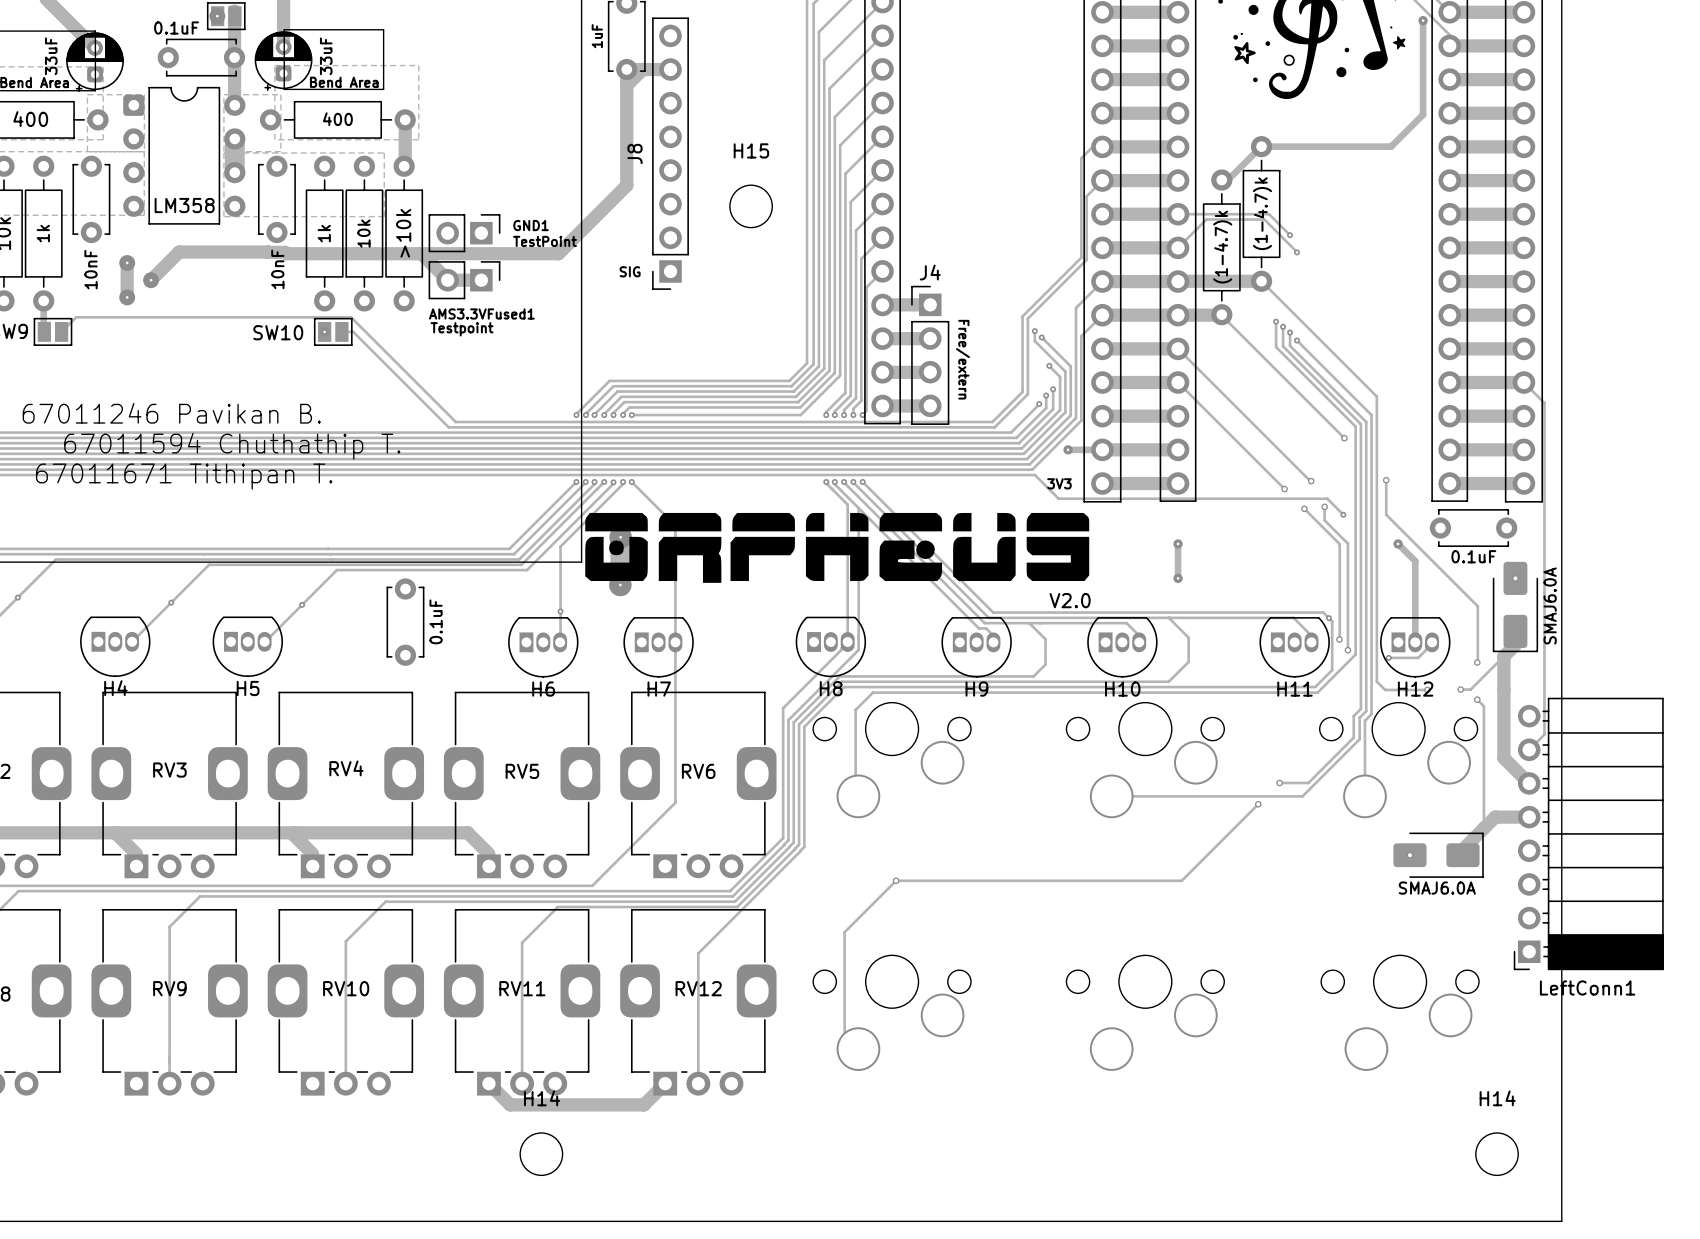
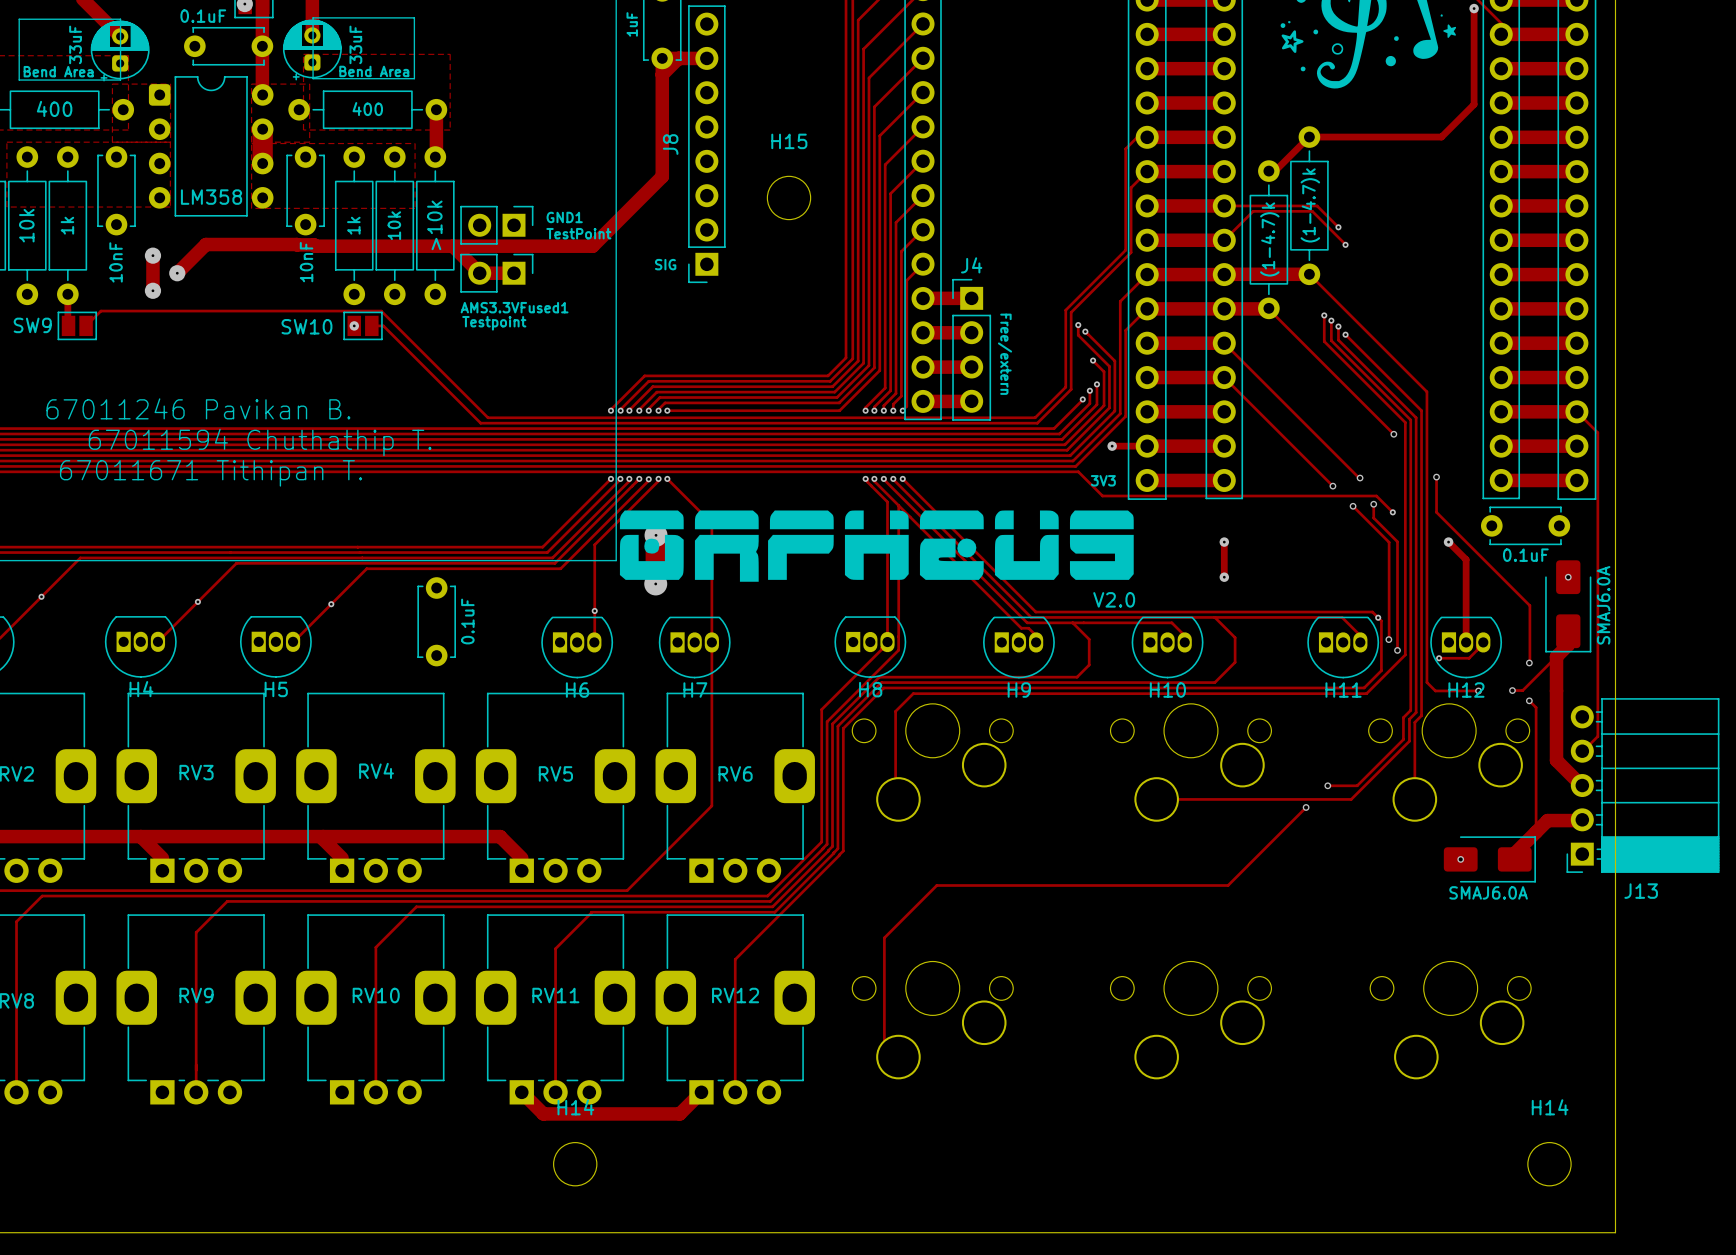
track: (1523, 382) (1544, 403) (1544, 436) -> (1576, 411) (1597, 432)
J13: none -> (1642, 785)
LeftConn1: (1588, 833) -> none
via: (896, 880) -> none

